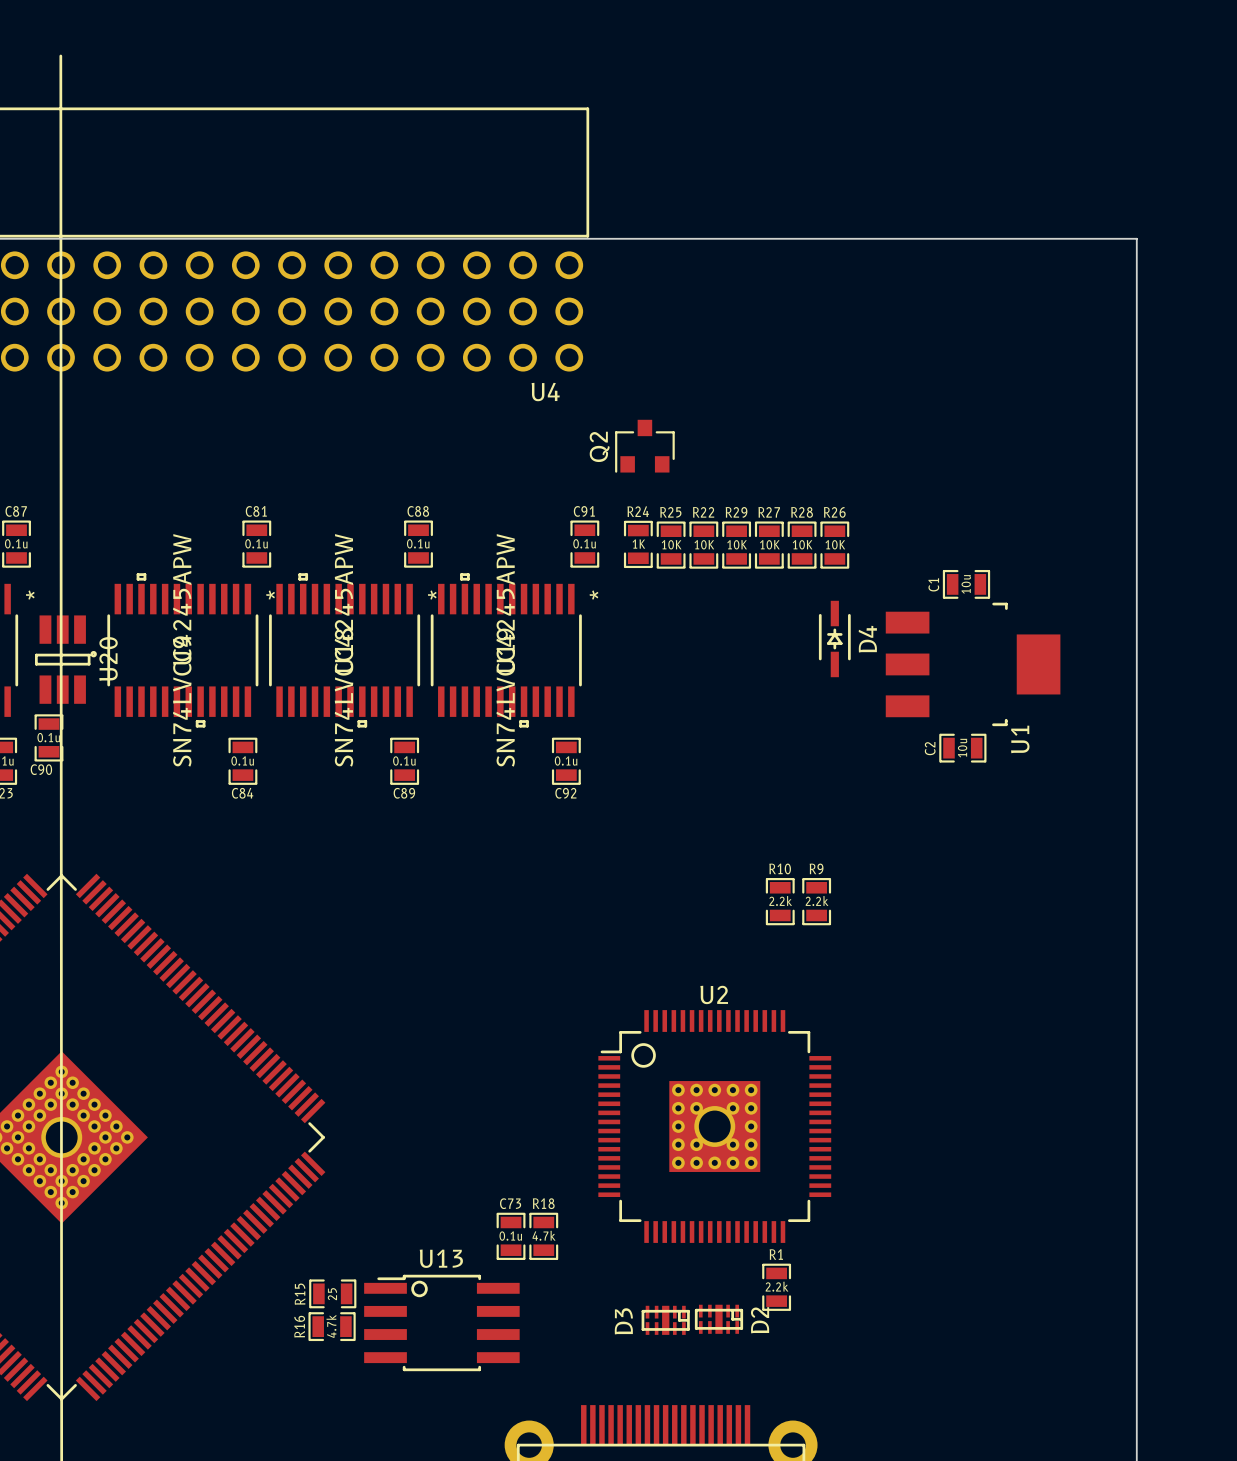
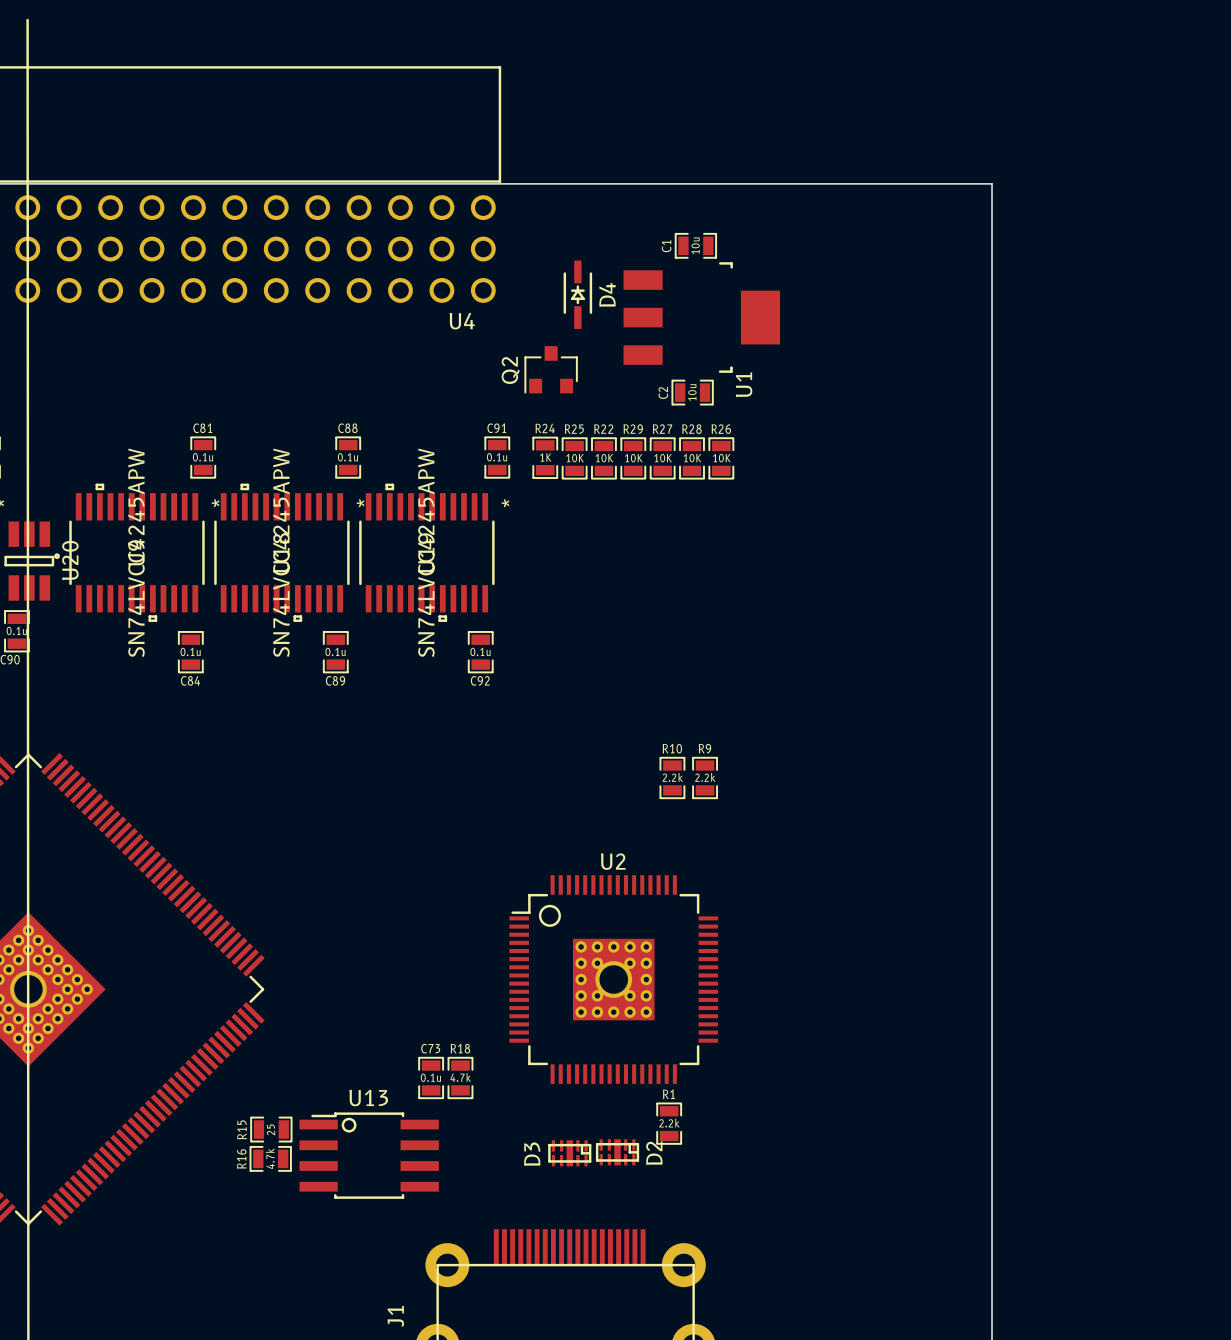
C1 position: (966, 584) -> (695, 245)
D4 position: (834, 638) -> (577, 294)
U1 position: (973, 664) -> (701, 317)
C2 position: (962, 748) -> (692, 392)

